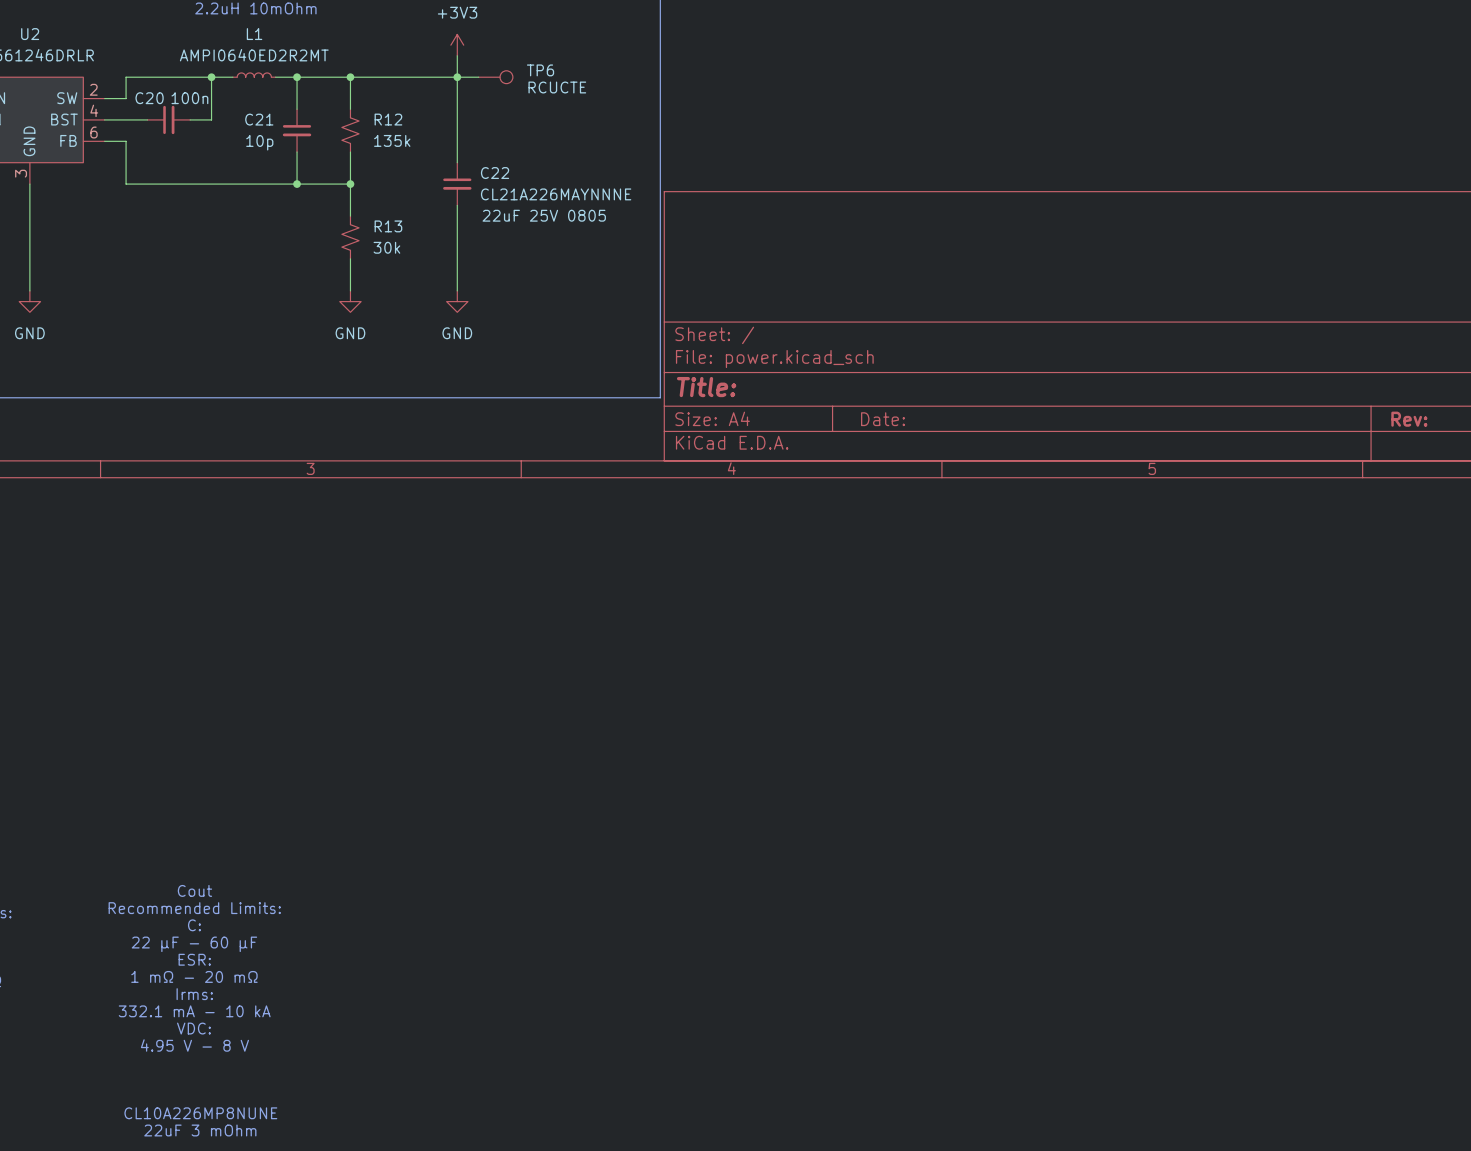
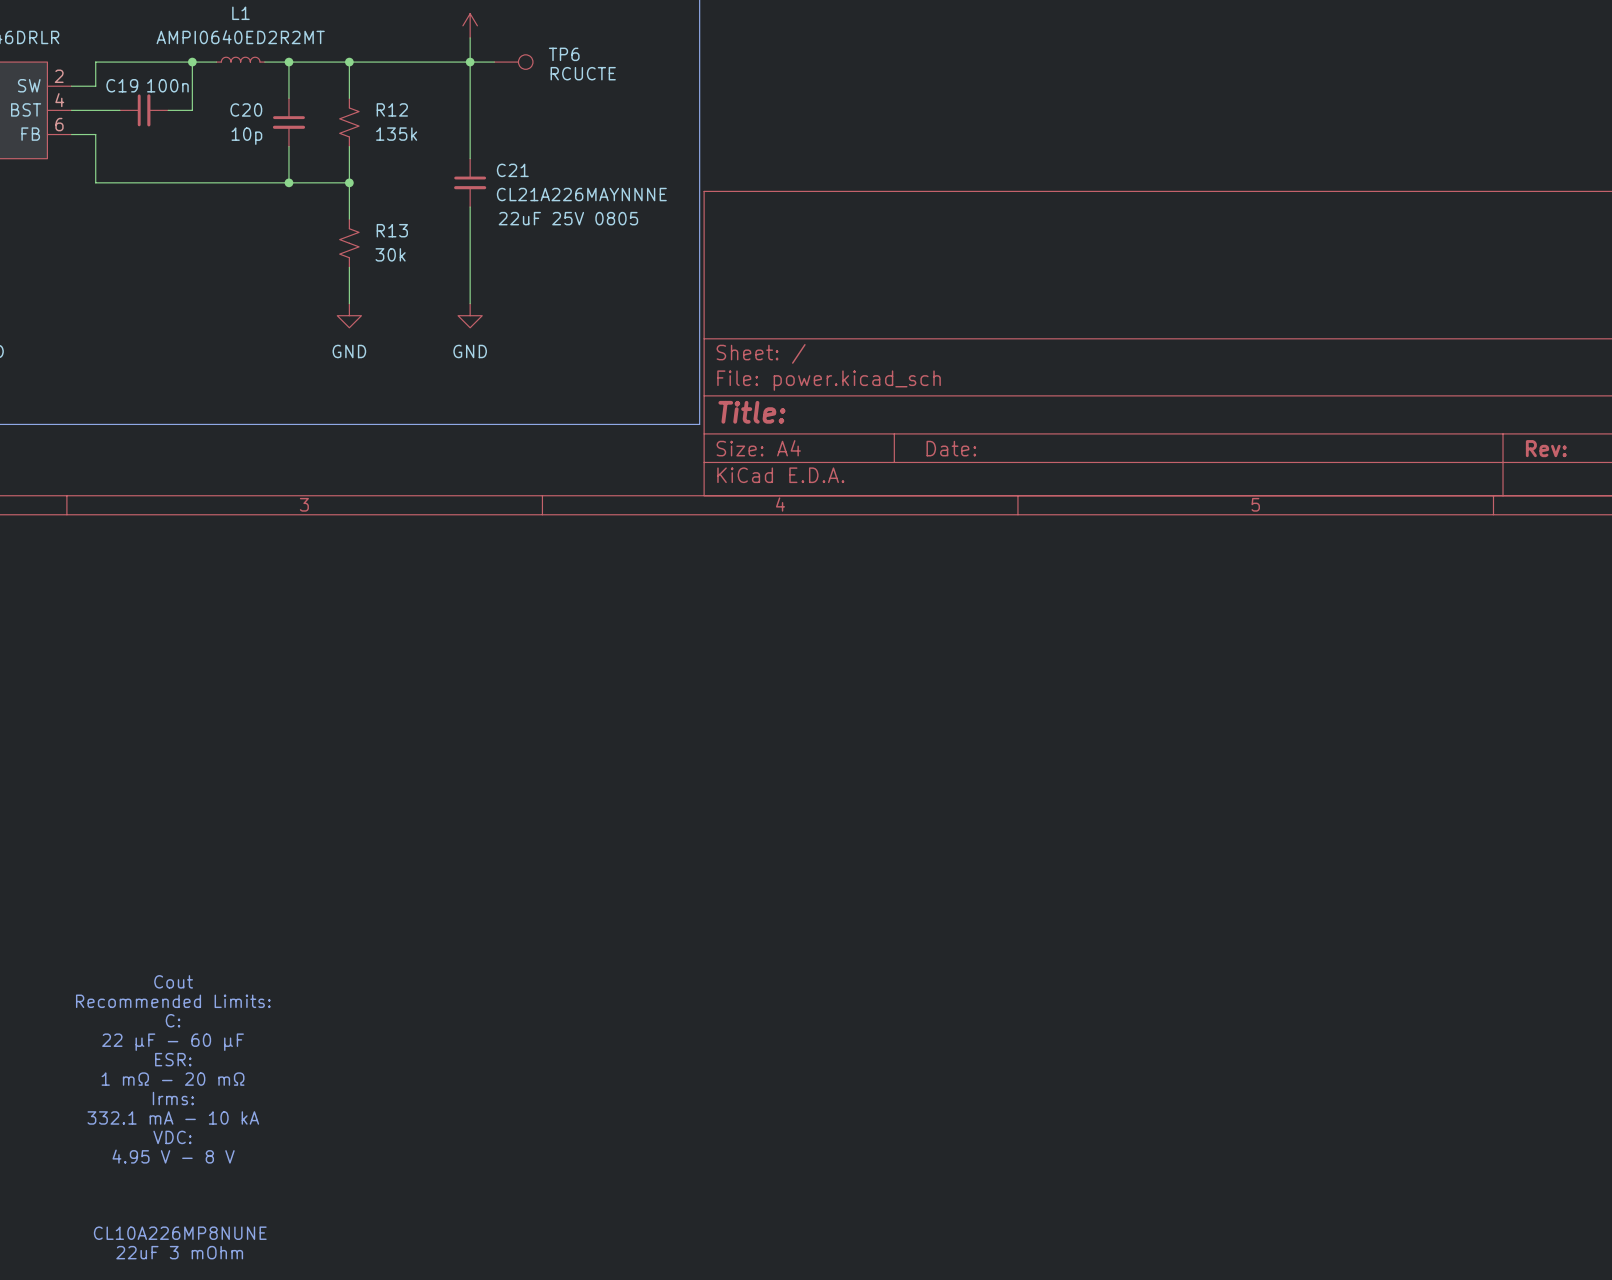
C20 name: C20 (149, 98) -> C19 (122, 85)
C21 name: C21 (259, 119) -> C20 (246, 109)
C22 name: C22 (495, 173) -> C21 (512, 170)

